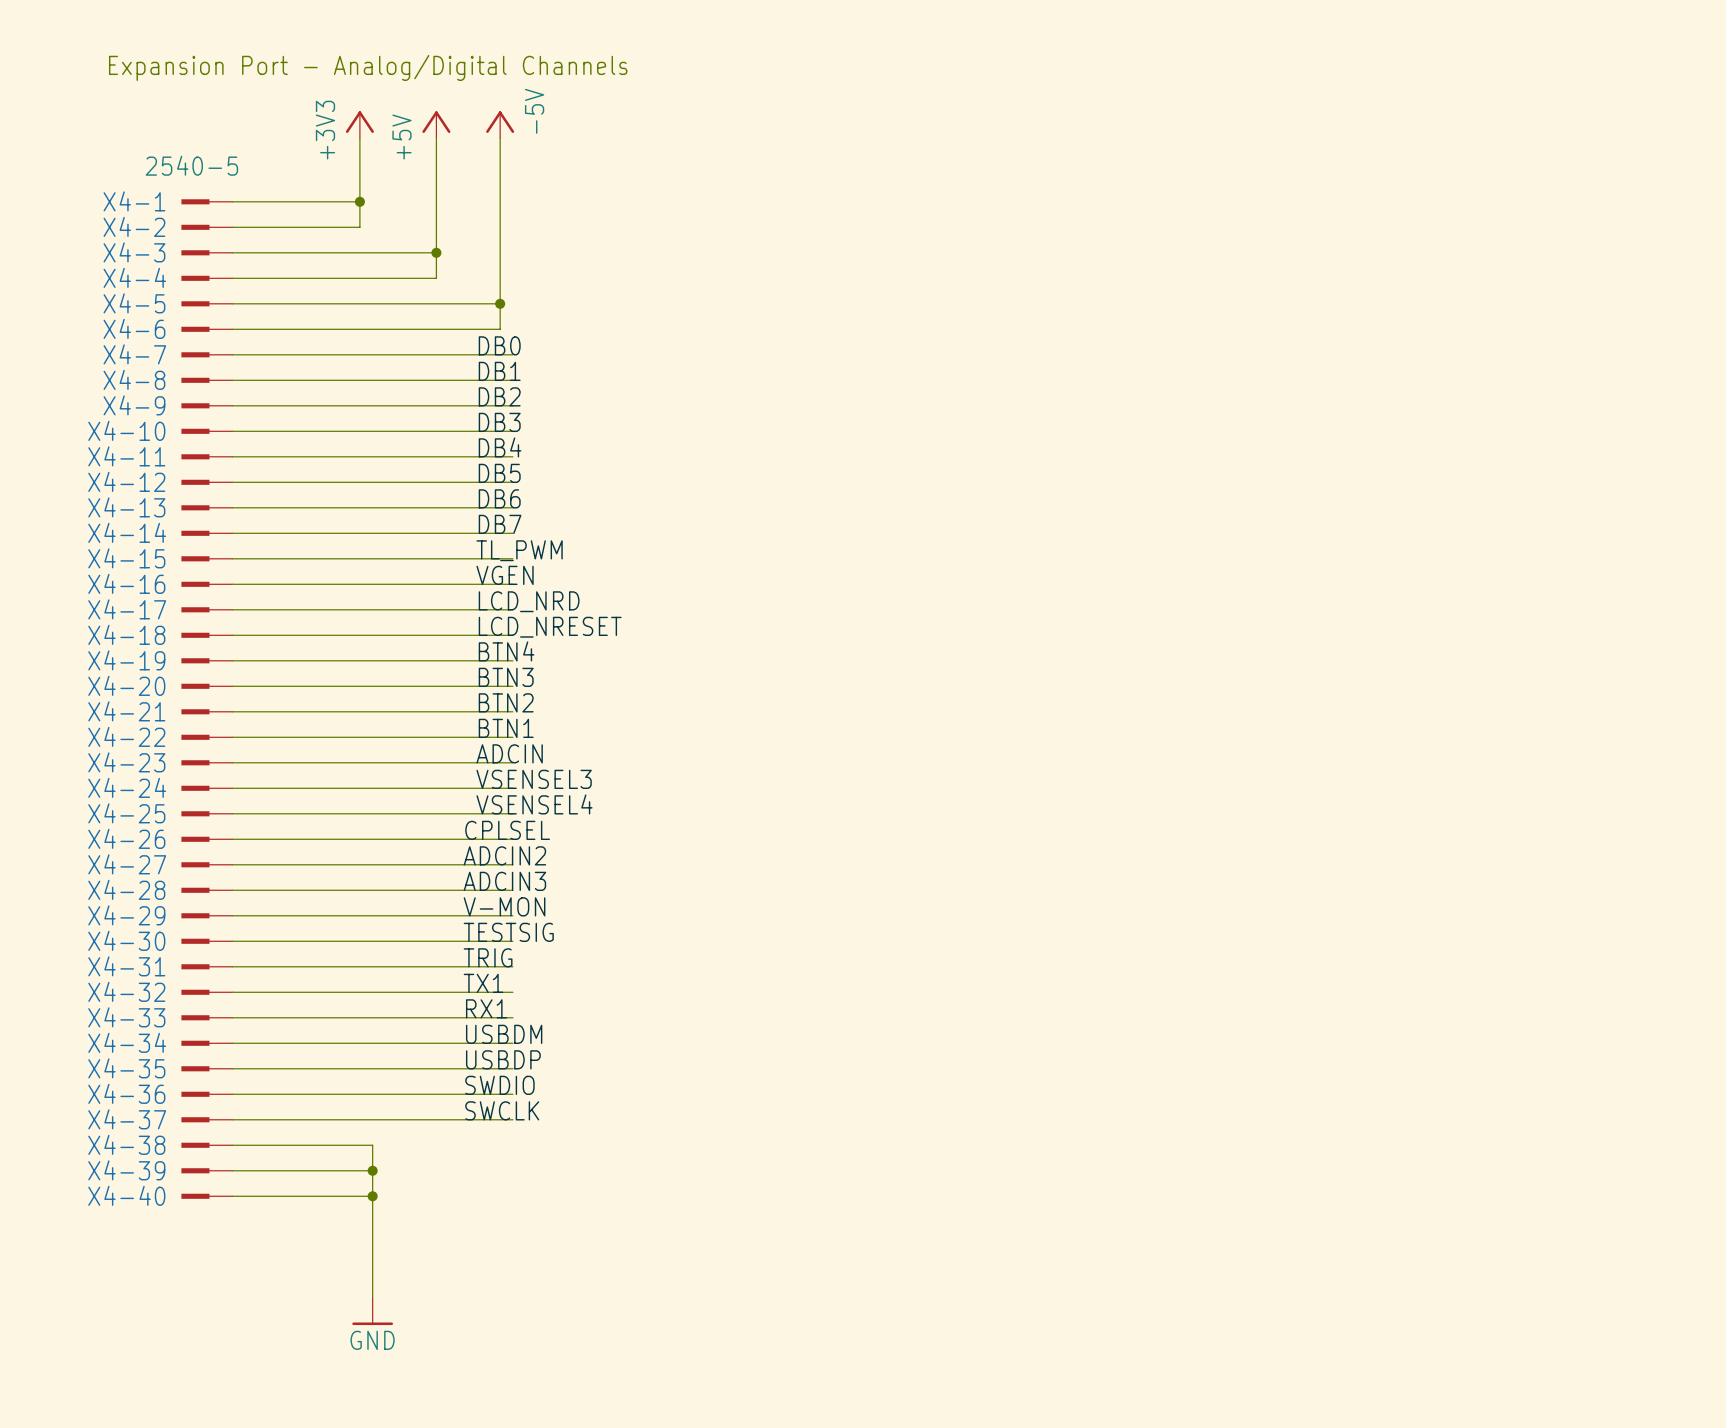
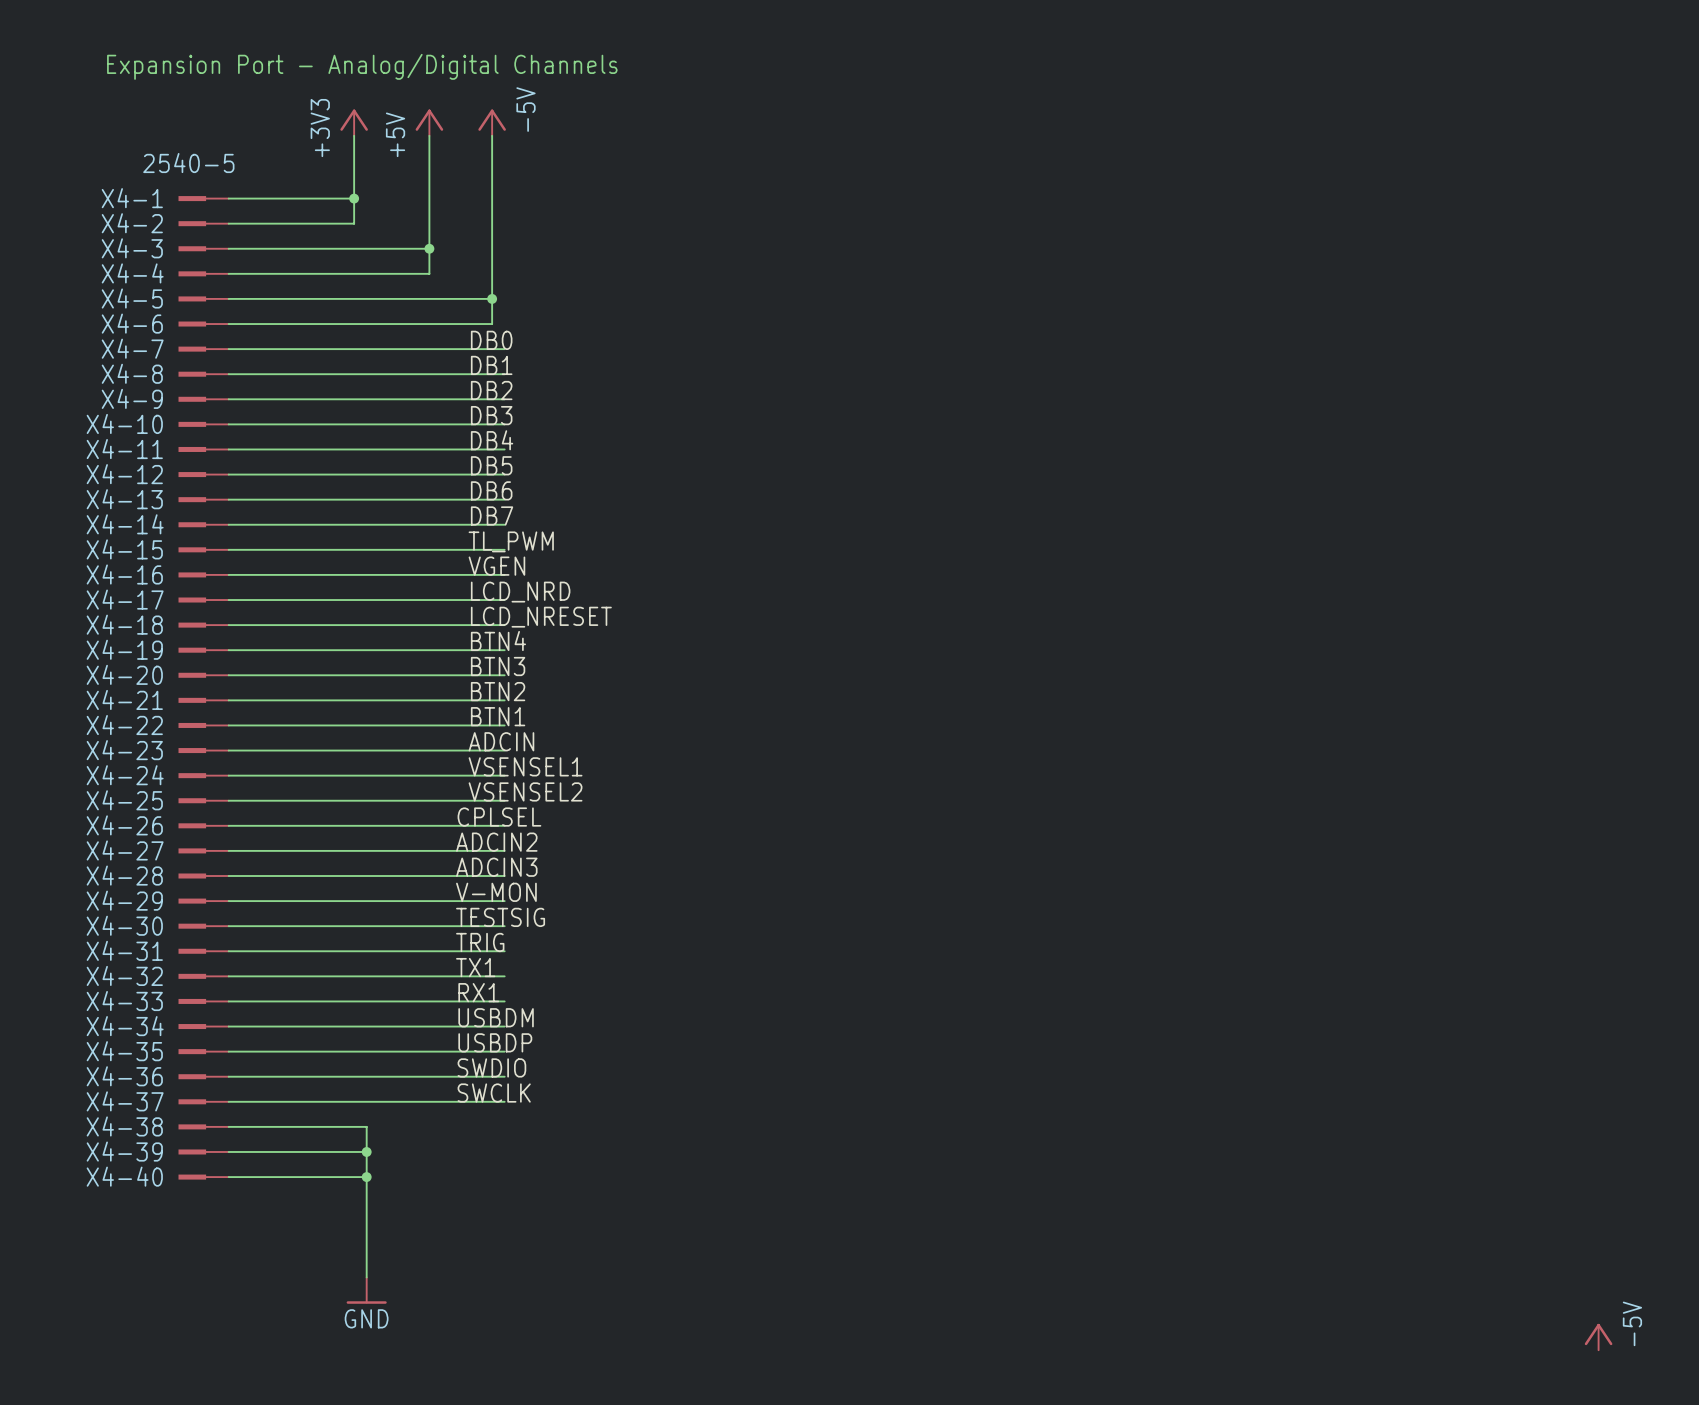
label: VSENSEL3 (534, 779) -> VSENSEL1 (525, 766)
label: VSENSEL4 (534, 804) -> VSENSEL2 (525, 791)
power symbol: none -> -5V (1598, 1337)

